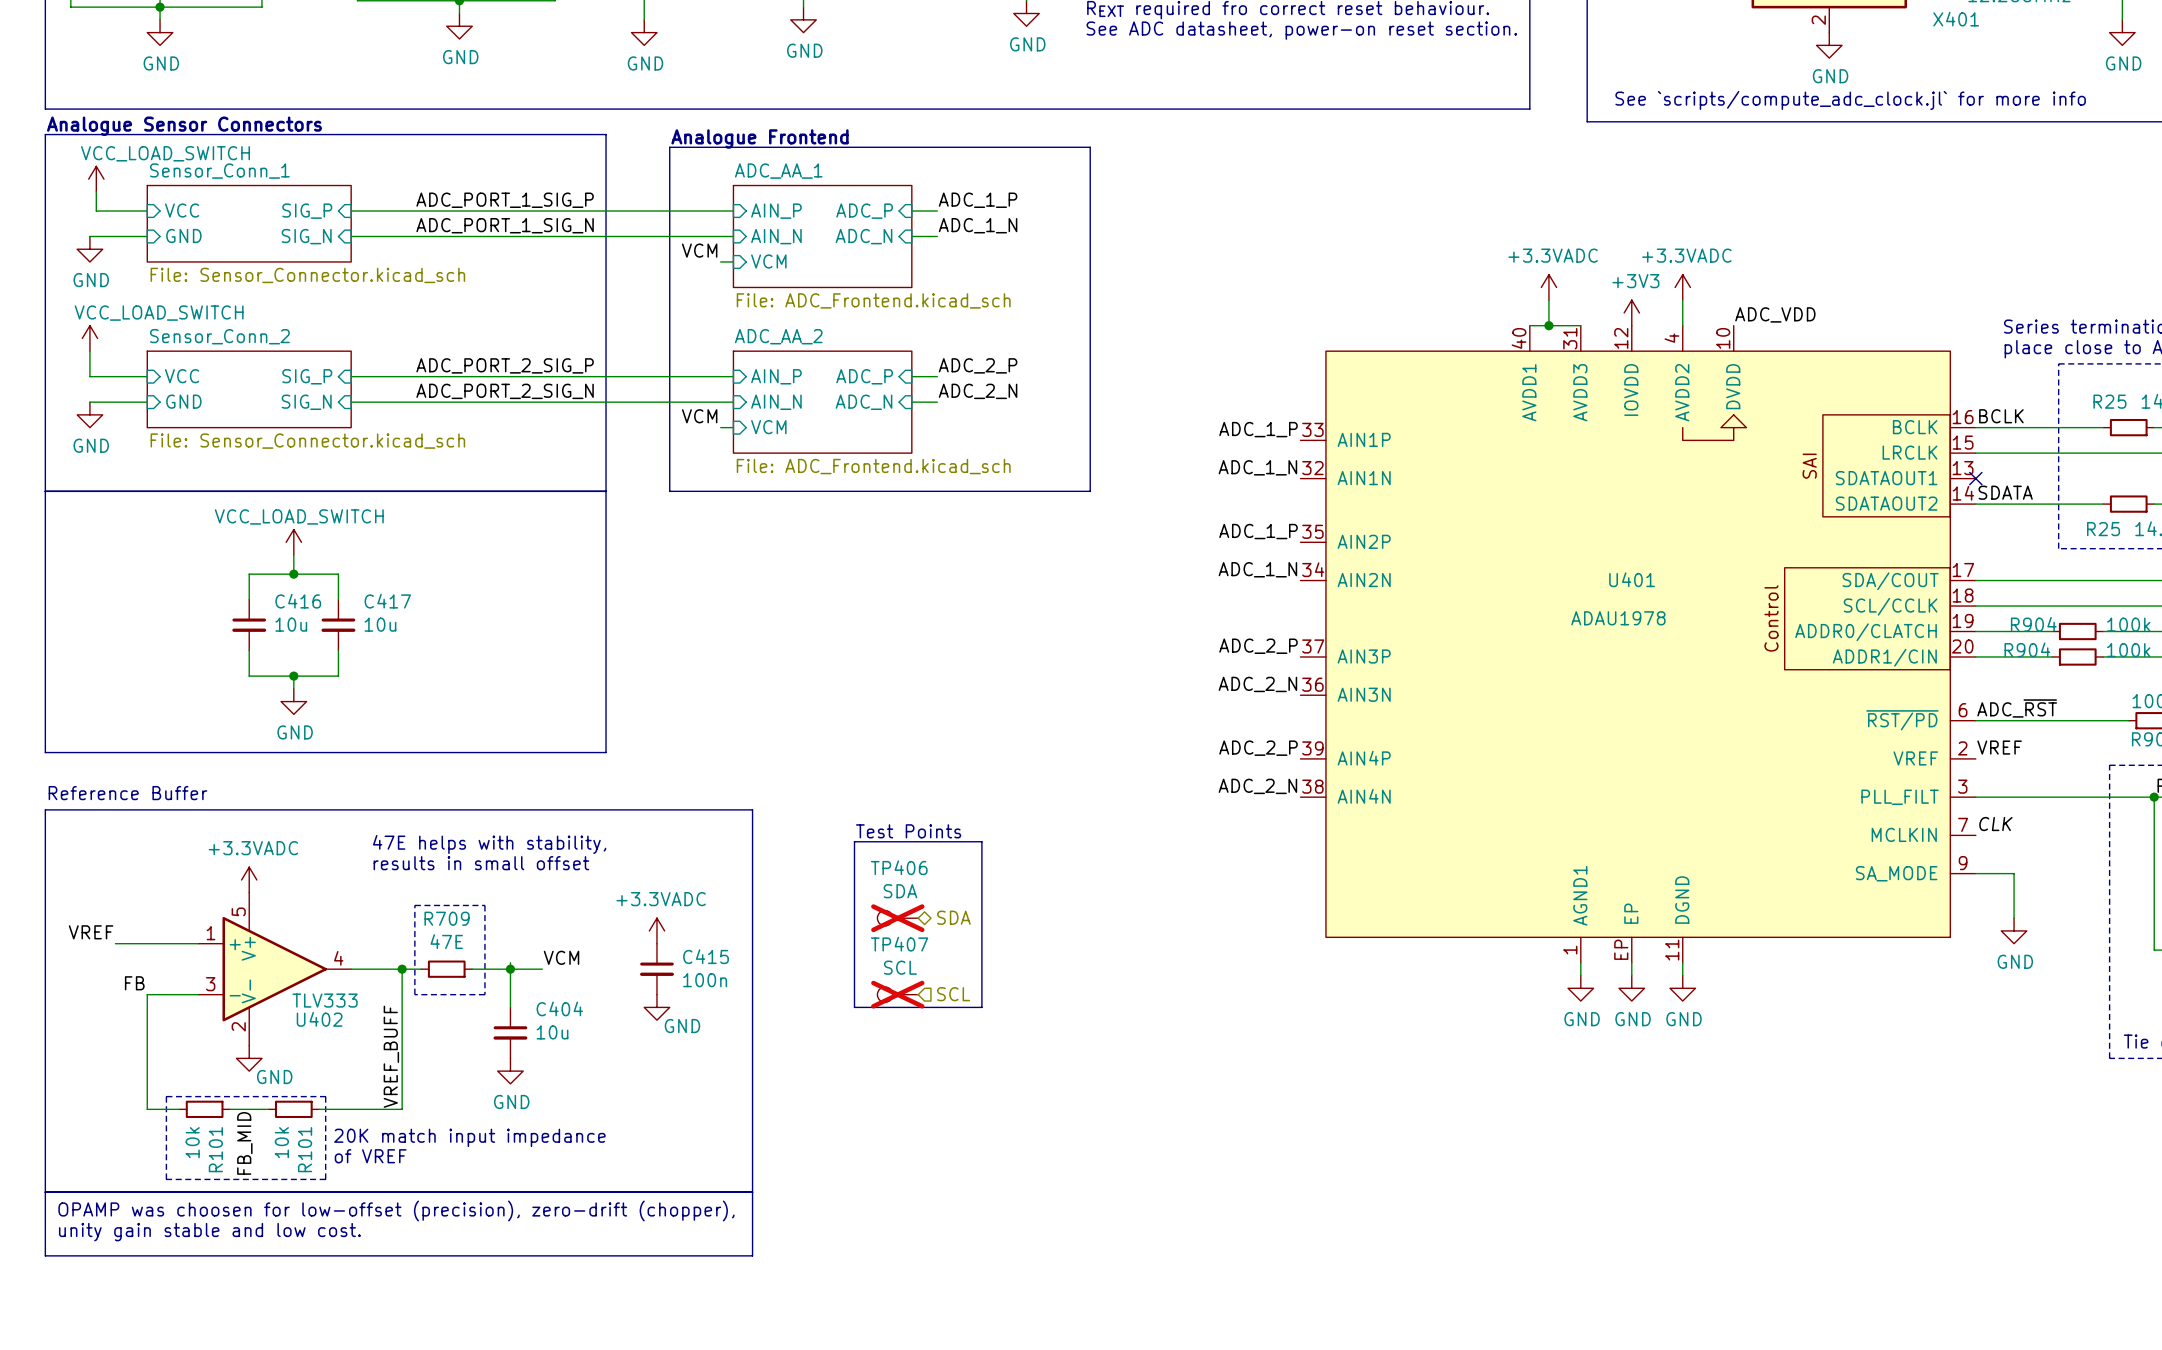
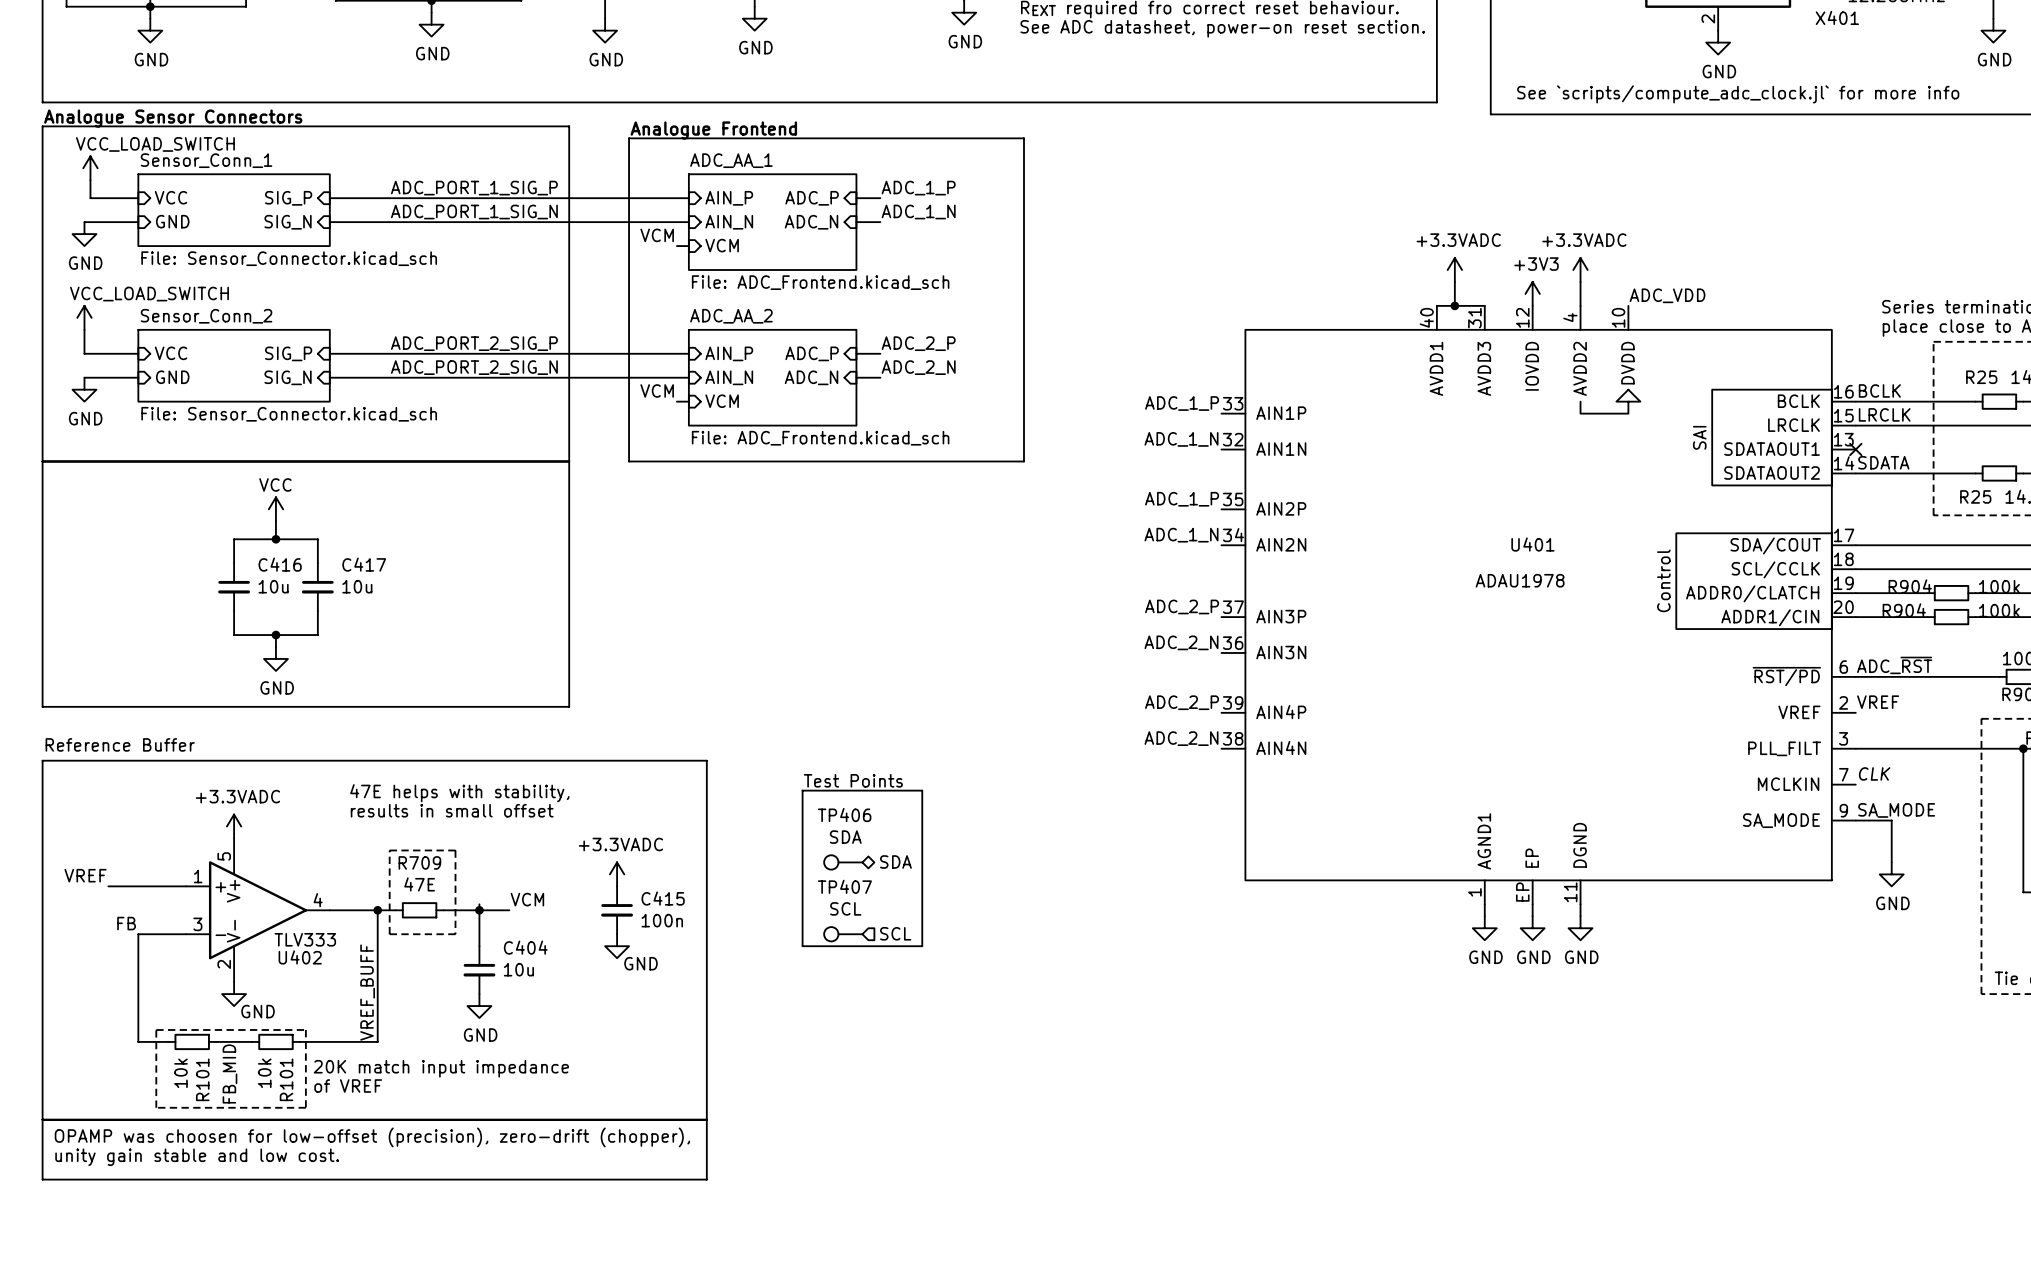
label: none -> LRCLK (1884, 414)
power symbol: VCC_LOAD_SWITCH (293, 542) -> VCC (275, 509)
label: none -> SA_MODE (1896, 810)
TP406 do-not-place cross: (897, 918) -> none
TP407 do-not-place cross: (897, 994) -> none

